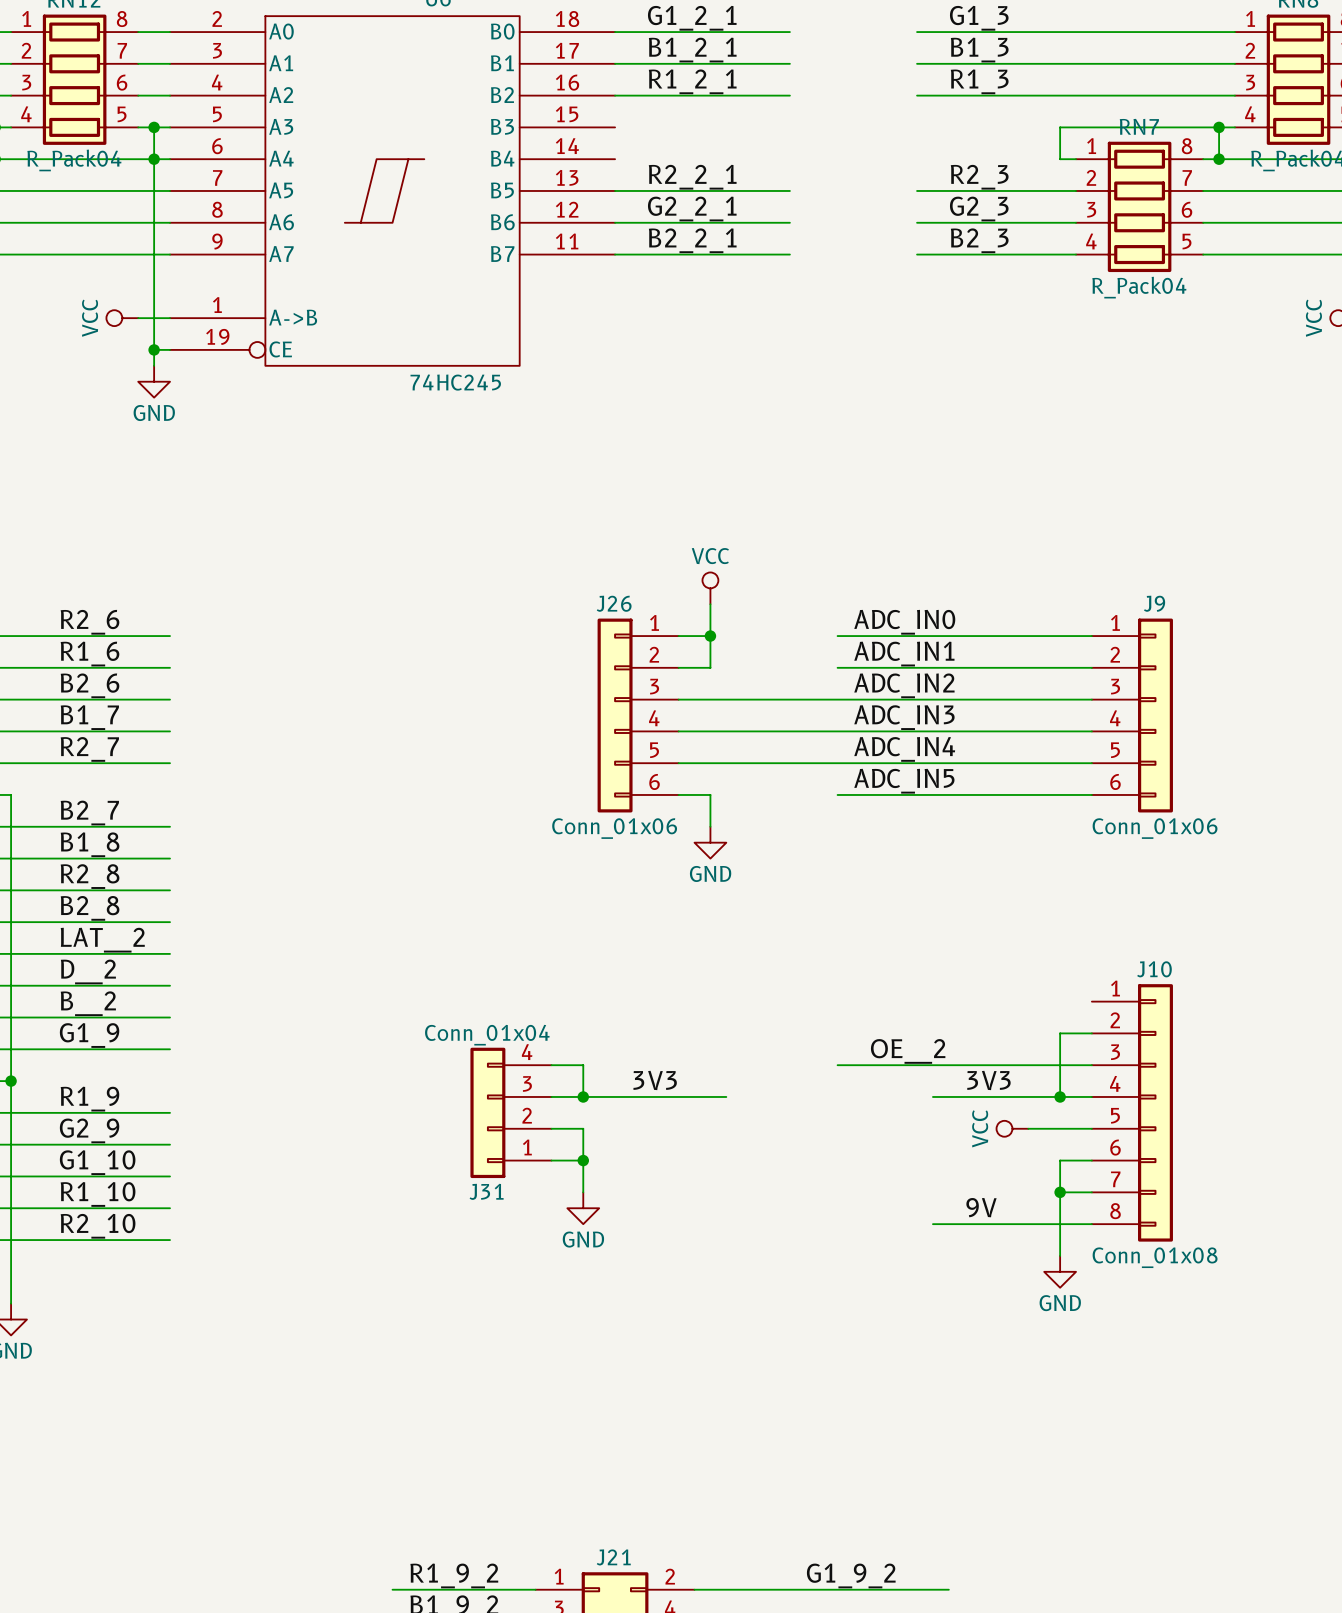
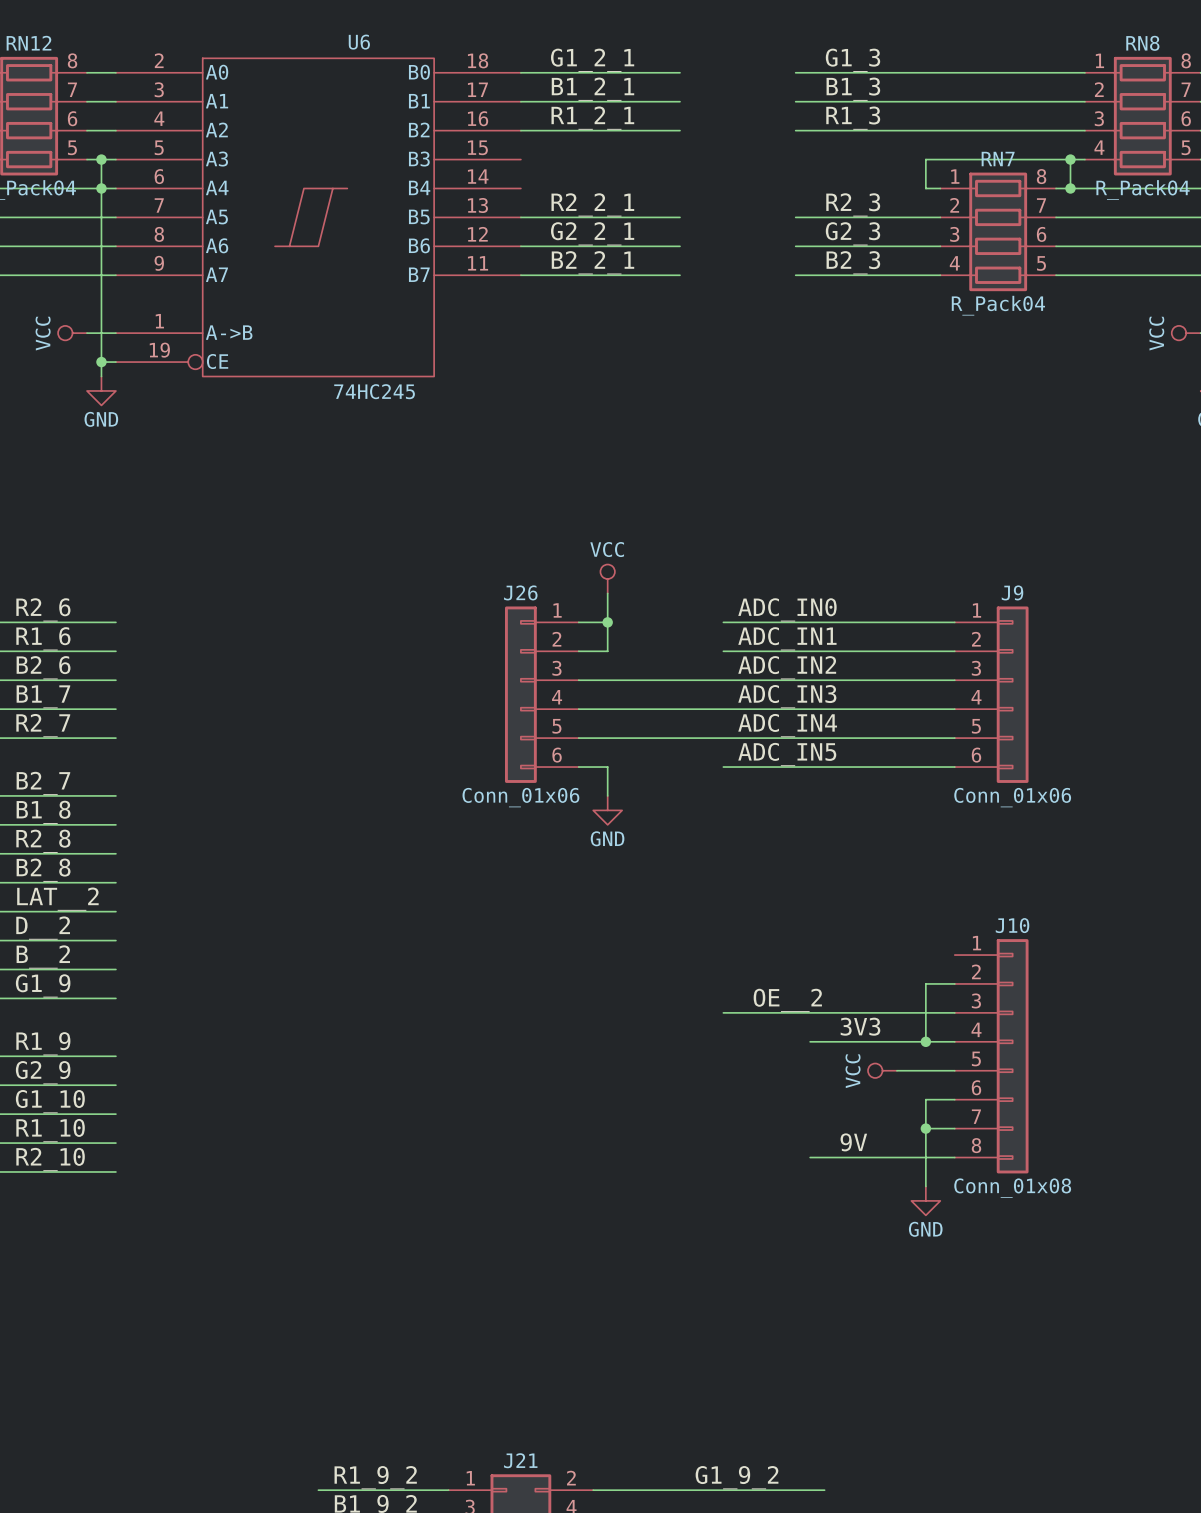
wire: (551, 1065) (583, 1065) (583, 1096) -> none
label: 3V3 (655, 1080) -> none
wire: (551, 1096) (726, 1096) -> none
junction: (583, 1096) -> none
J31: Conn_01x04 (510, 1112) -> none
wire: (551, 1128) (583, 1128) (583, 1192) -> none
wire: (551, 1160) (583, 1160) -> none
junction: (583, 1160) -> none
power symbol: GND (583, 1208) -> none

